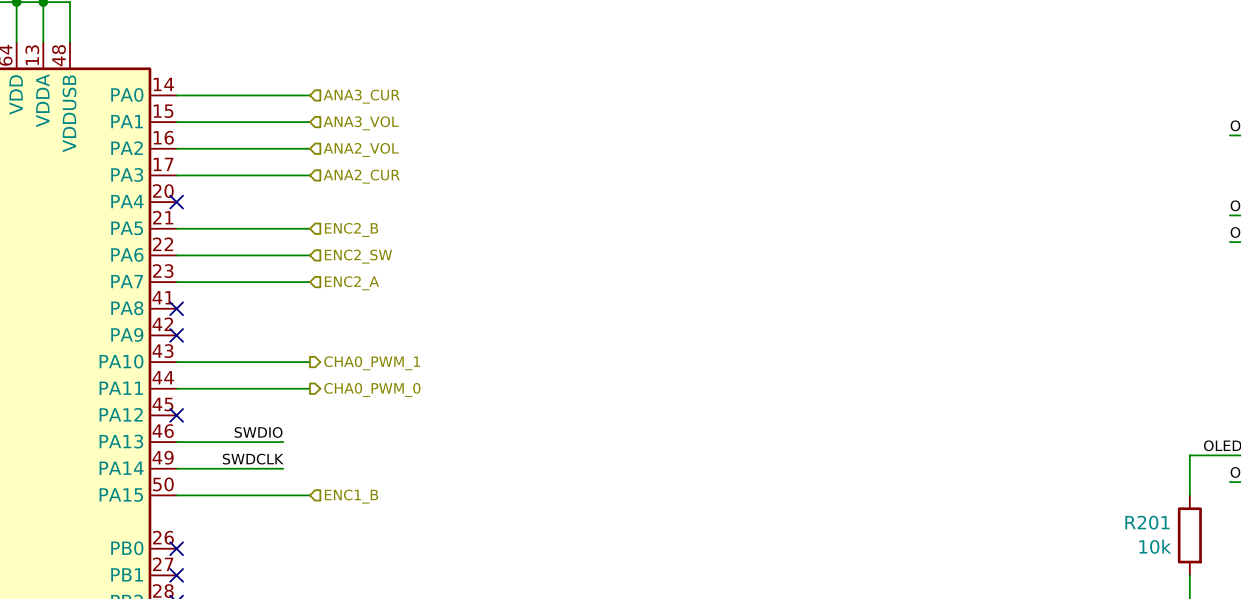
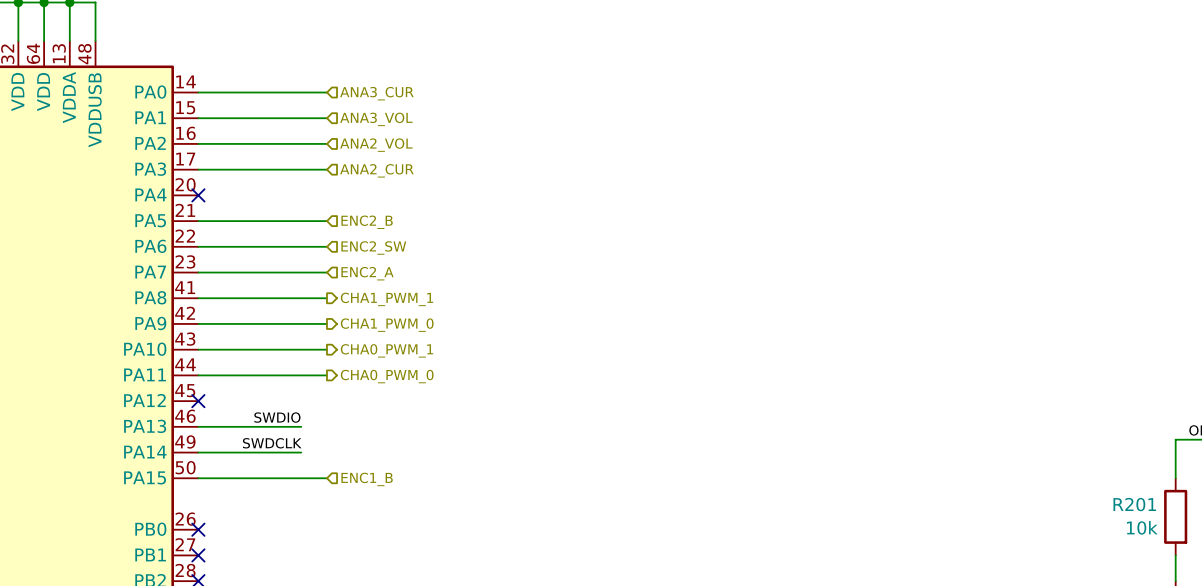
wire: none -> (198, 298) (326, 298)
no-connect mark: (176, 308) -> none
hierarchical label: none -> CHA1_PWM_1 (387, 299)
wire: none -> (198, 323) (326, 323)
no-connect mark: (176, 335) -> none
hierarchical label: none -> CHA1_PWM_0 (387, 325)

